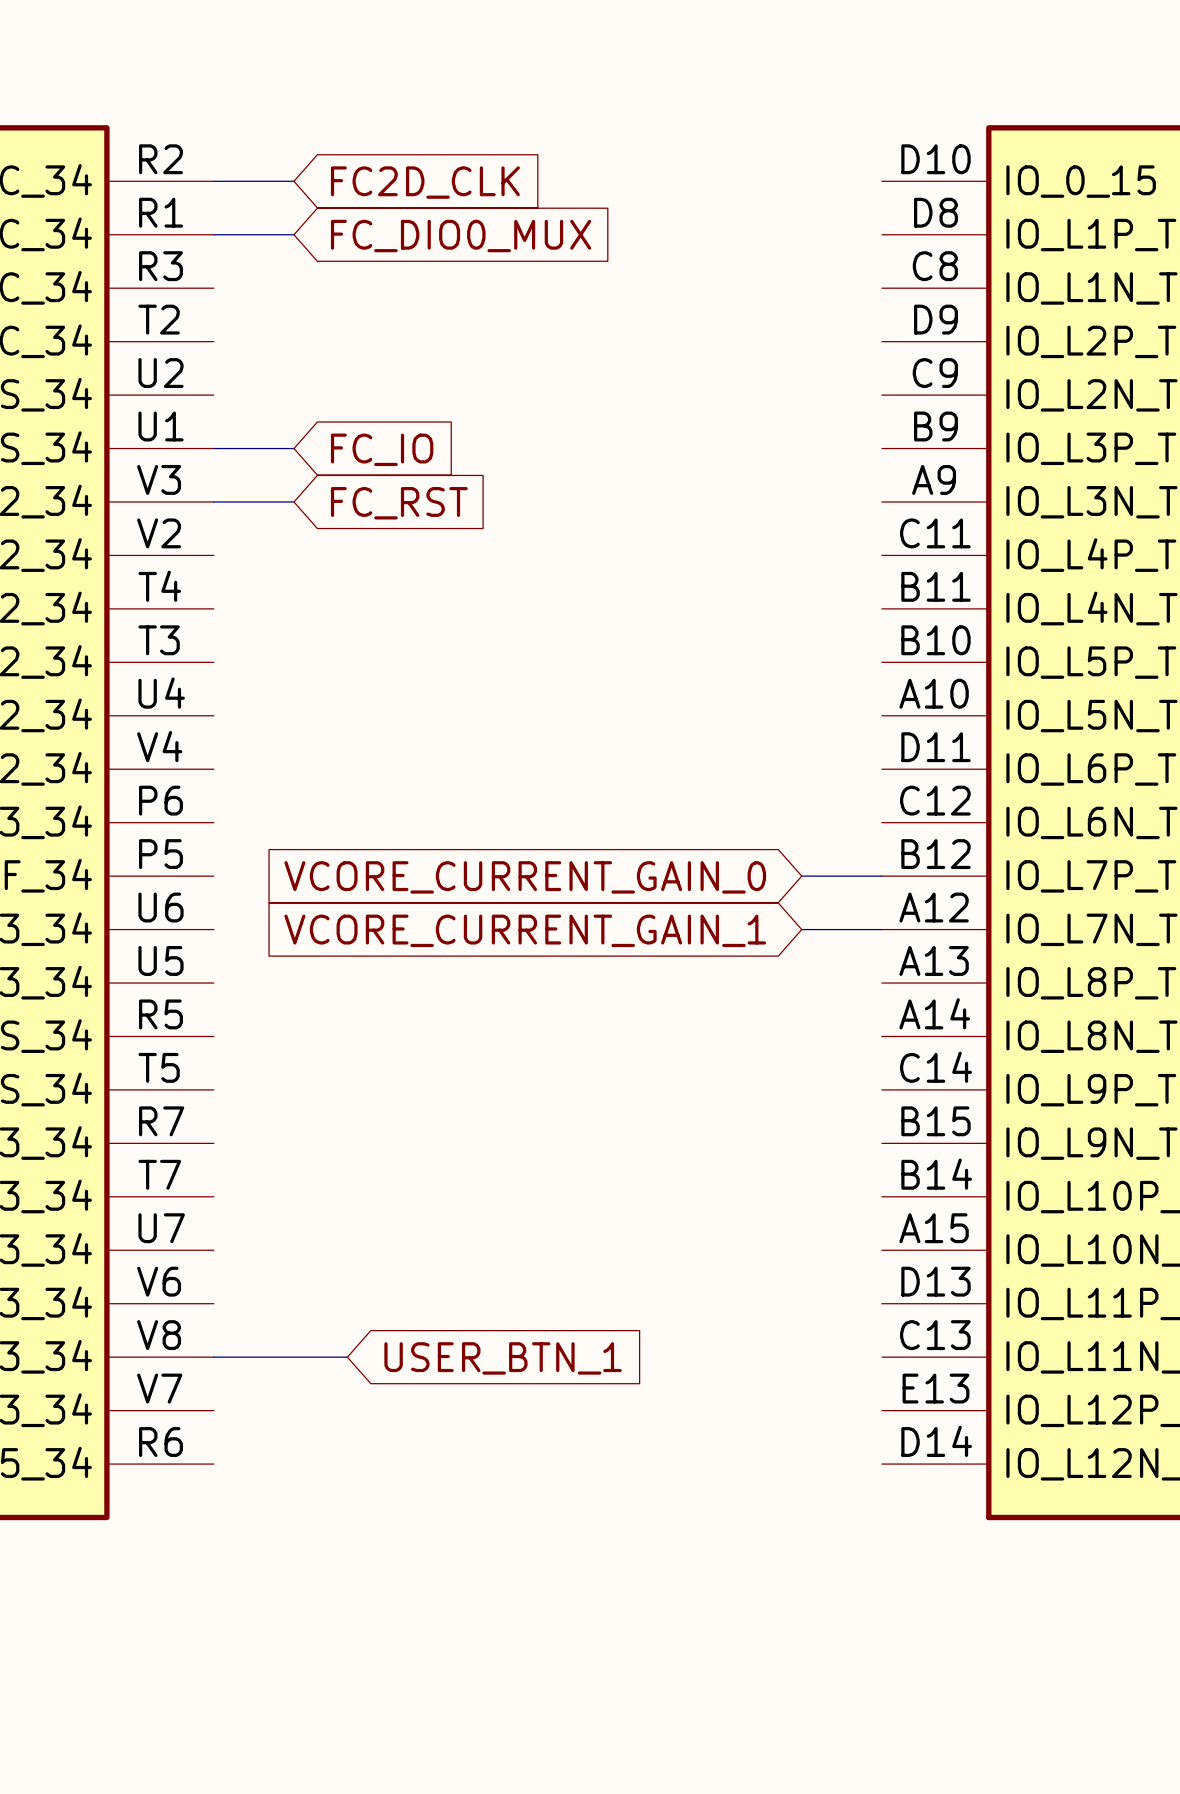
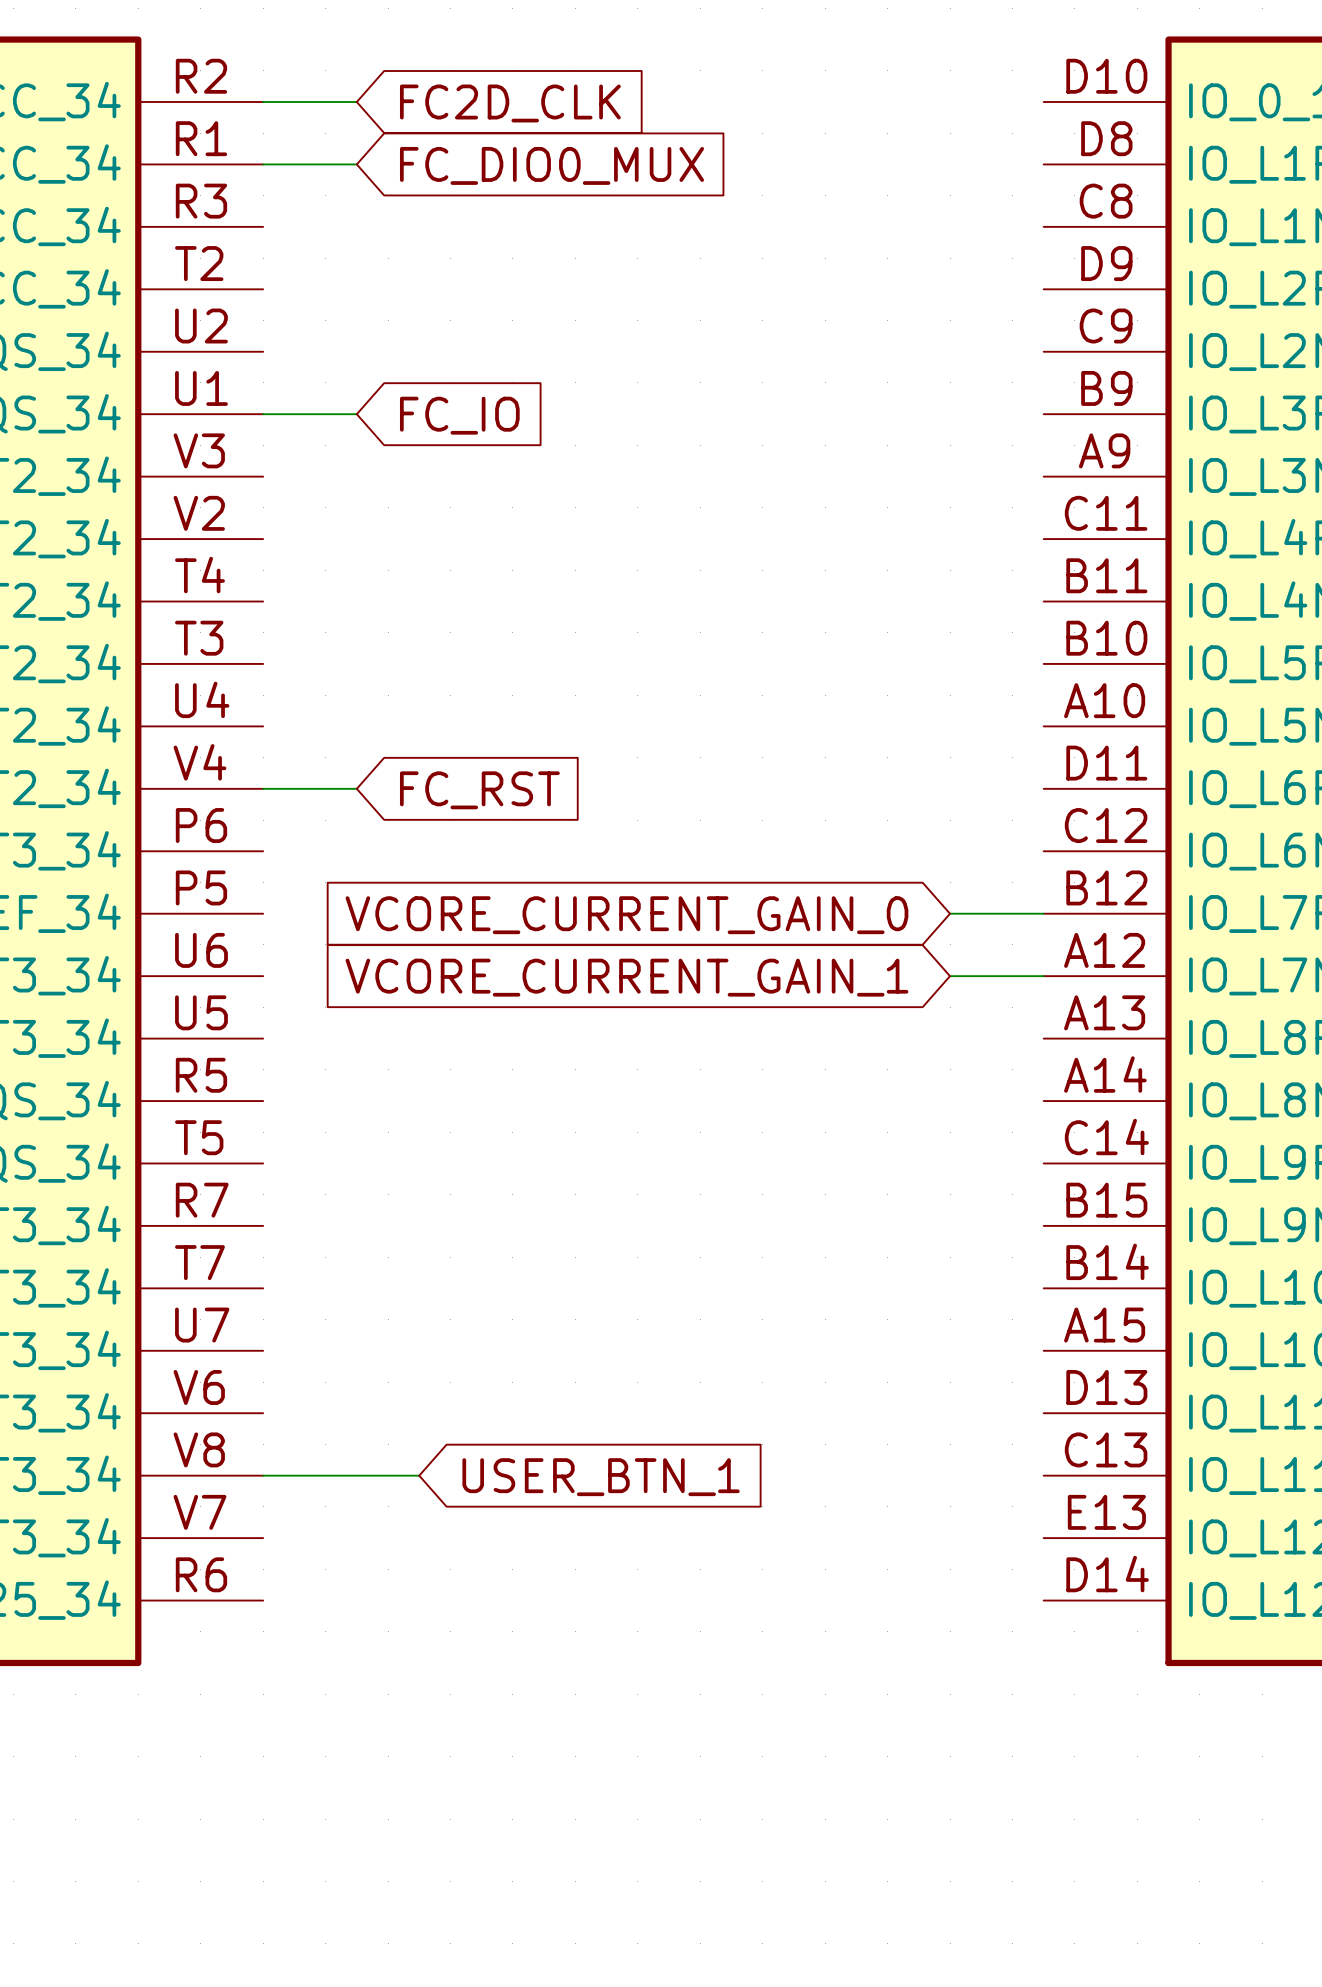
wire: (213, 501) (293, 501) -> (263, 788) (356, 788)
global label position: FC_RST (399, 503) -> FC_RST (479, 790)

